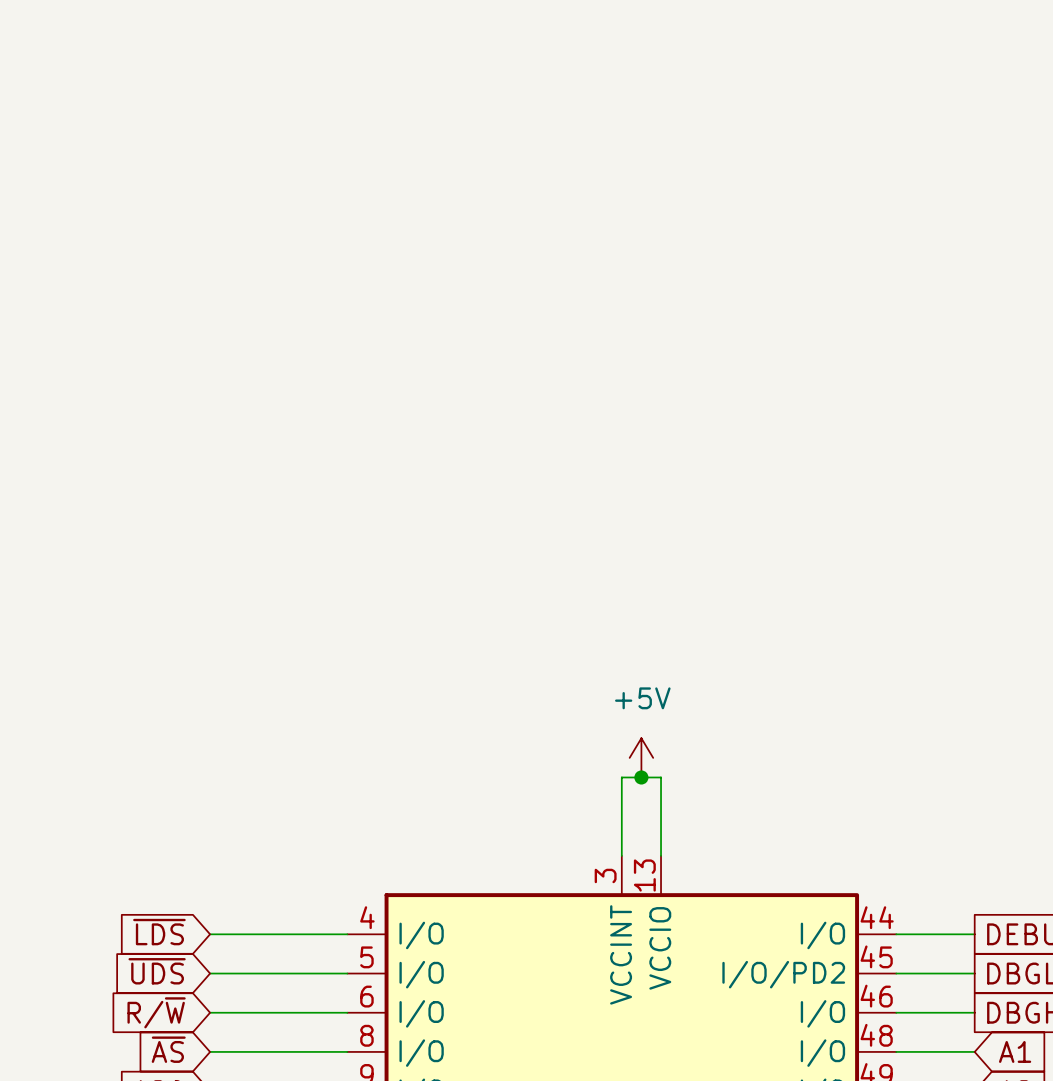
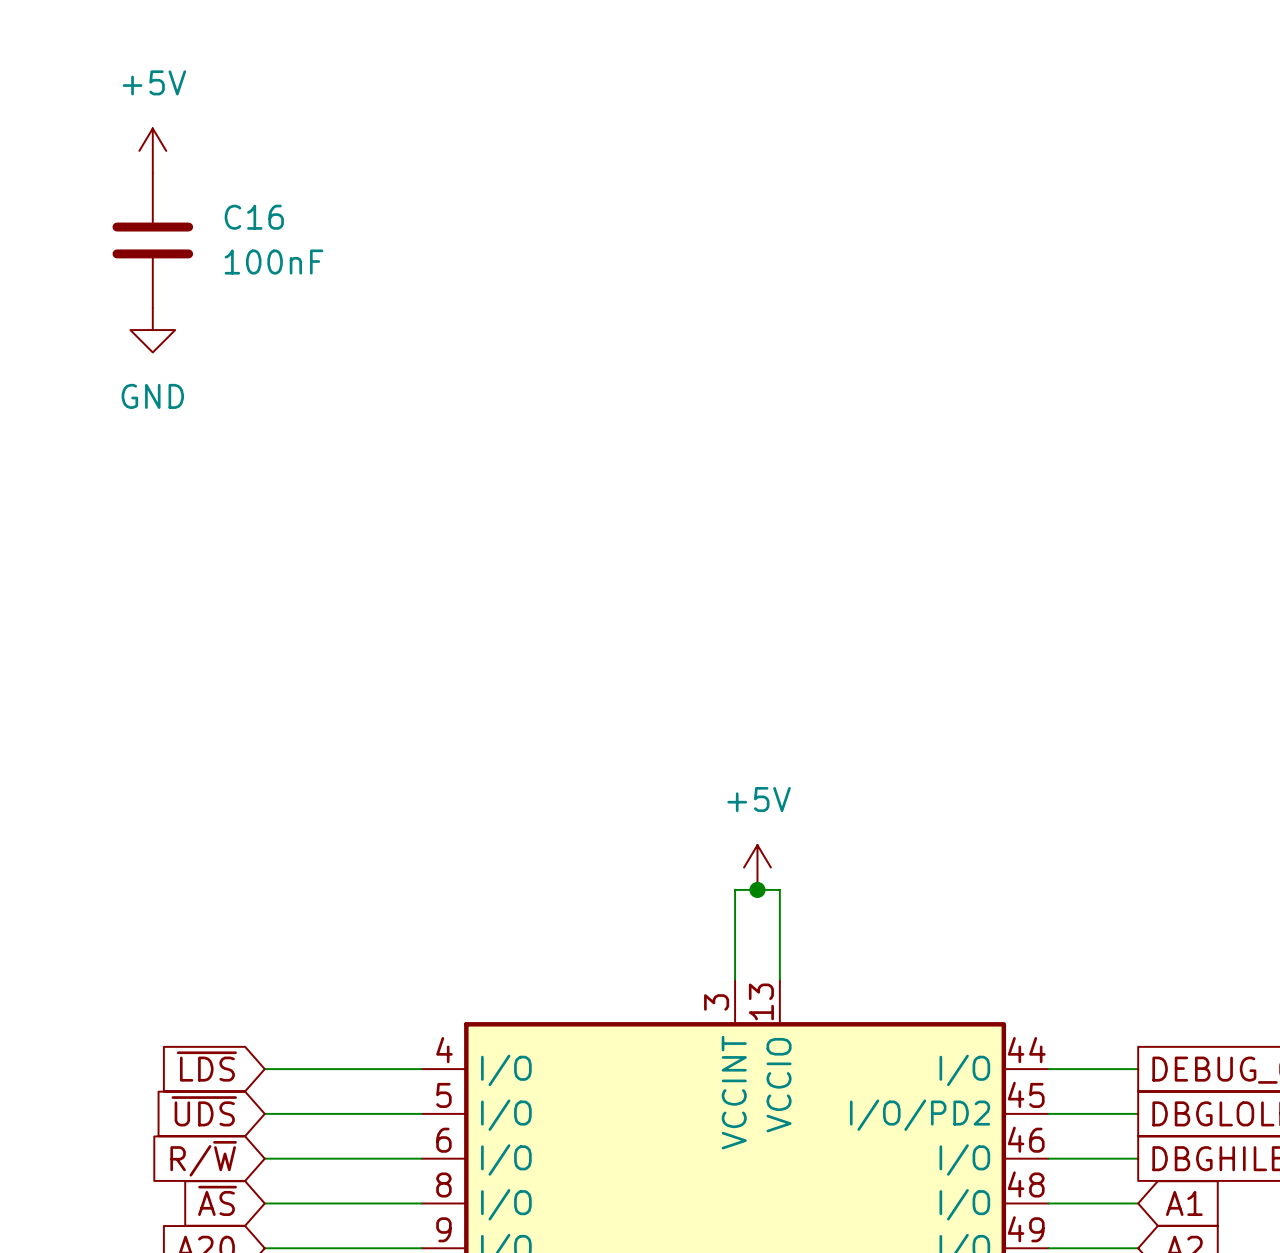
power symbol: none -> +5V (152, 150)
C16: none -> 100nF (152, 240)
power symbol: none -> GND (152, 330)

